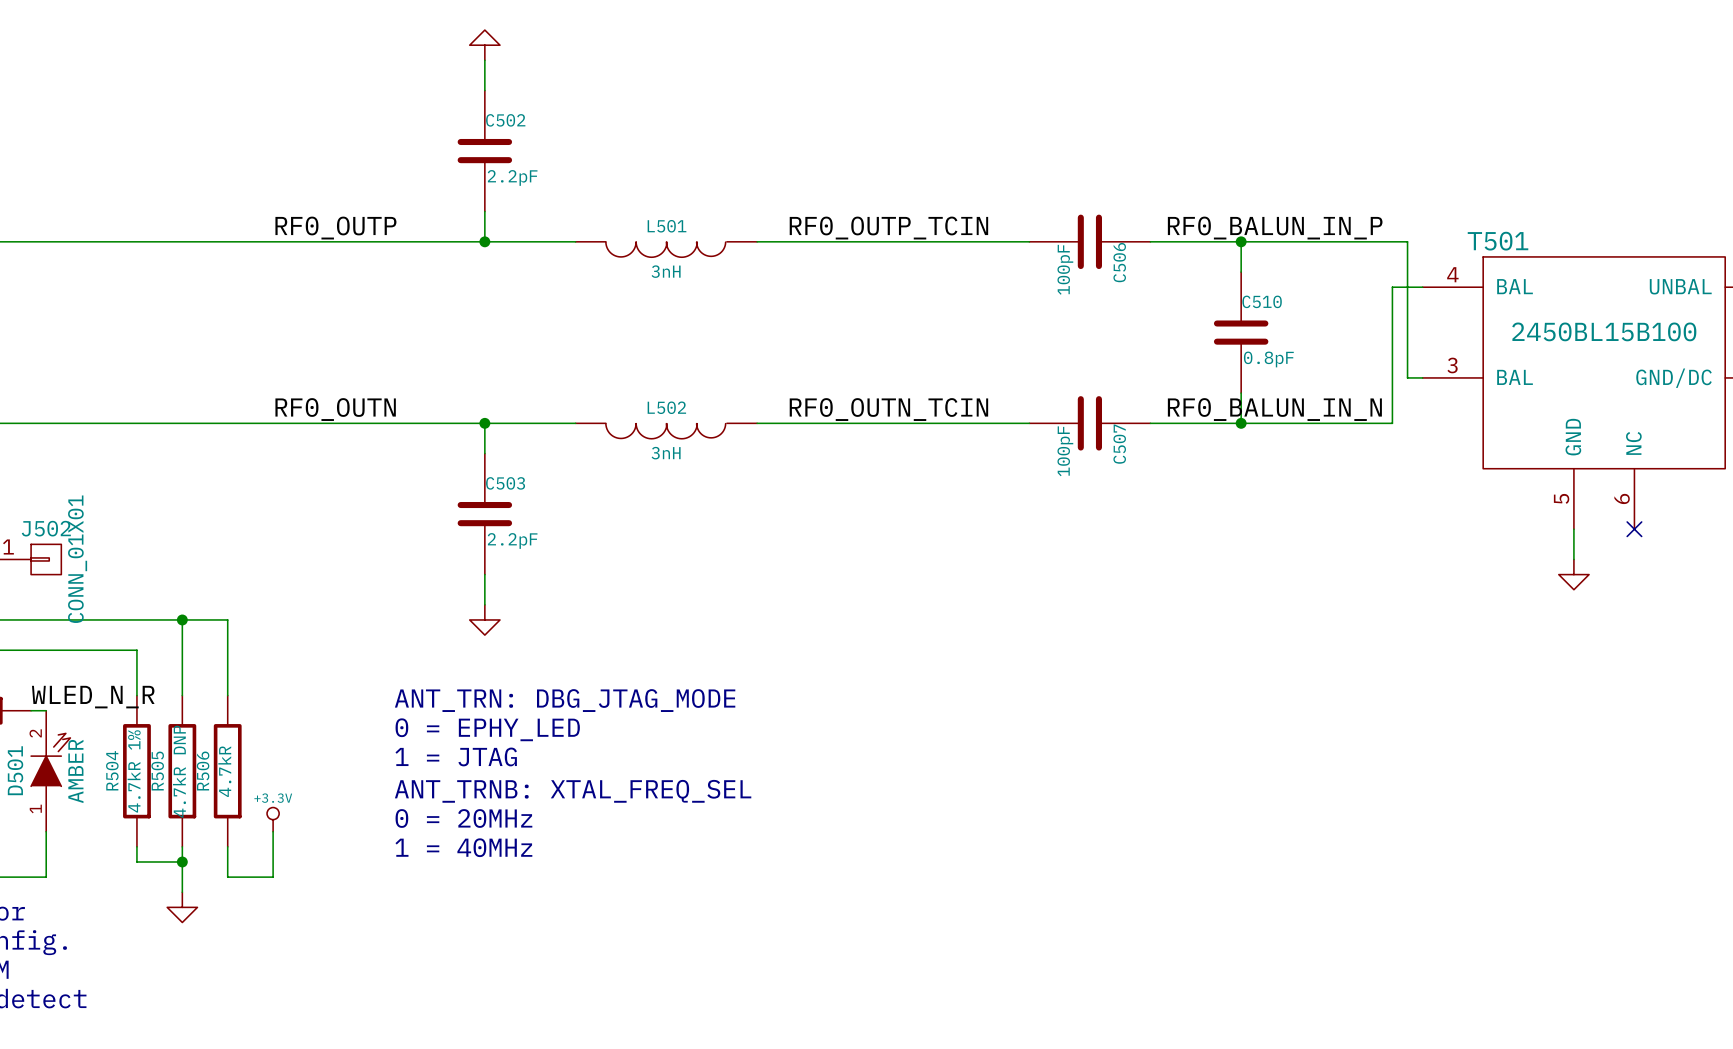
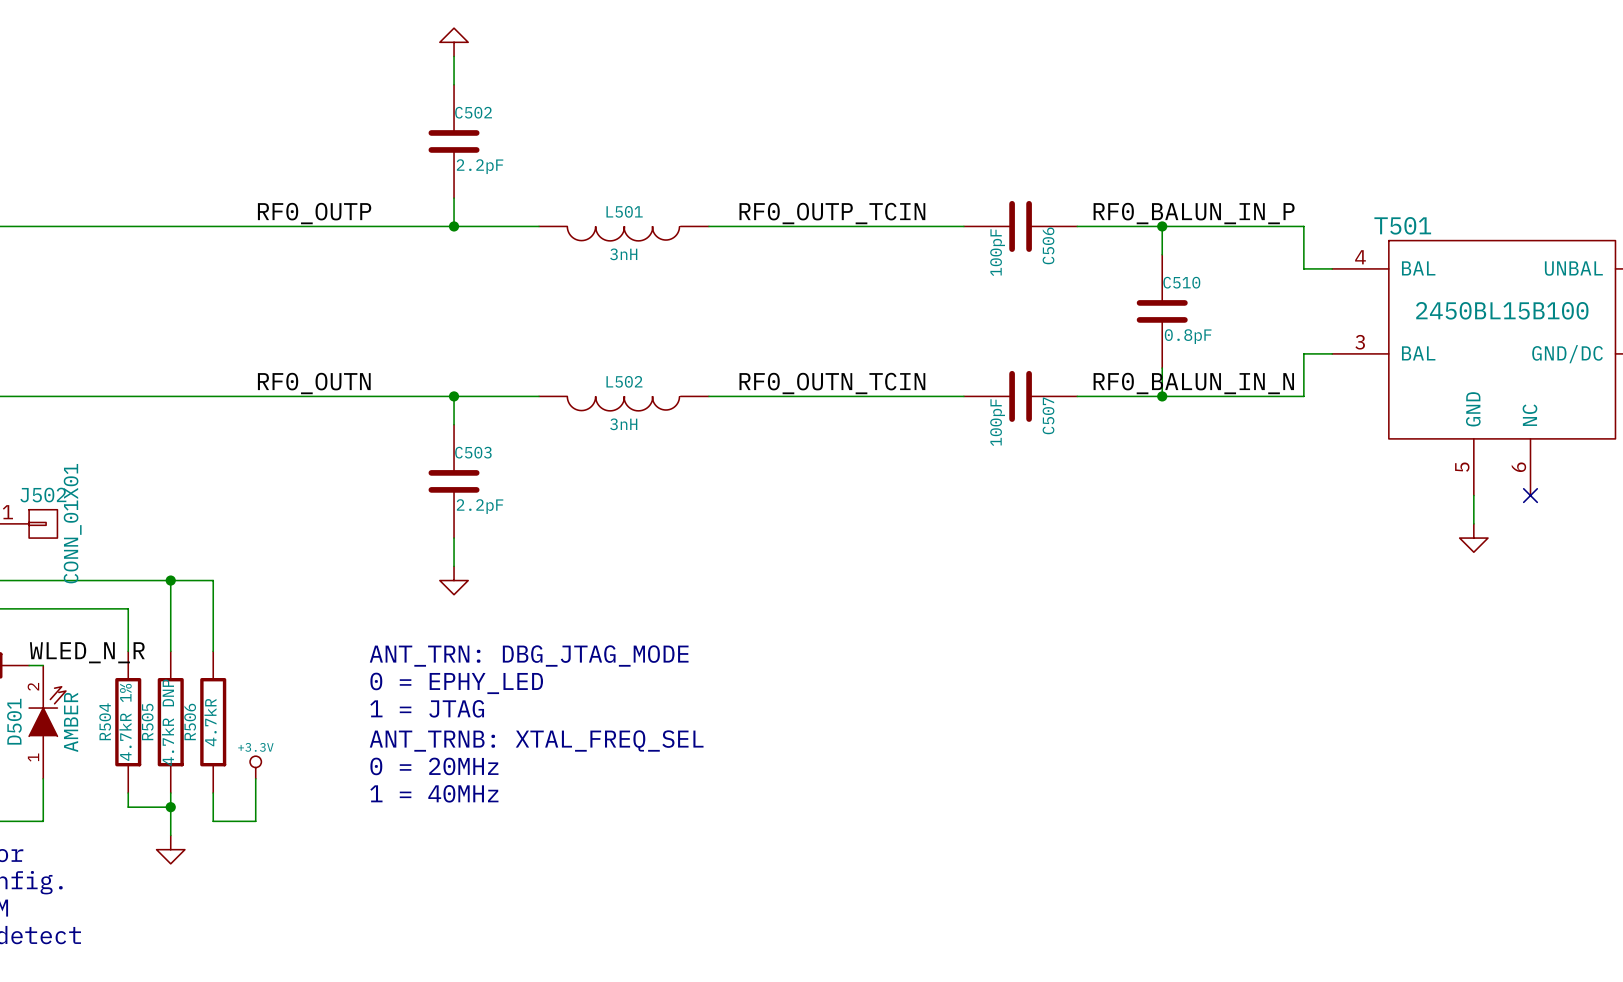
wire: (1392, 241) (1407, 241) (1407, 377) -> (1303, 226) (1303, 268)
wire: (1392, 287) (1392, 377) -> (1318, 353) (1303, 353)

